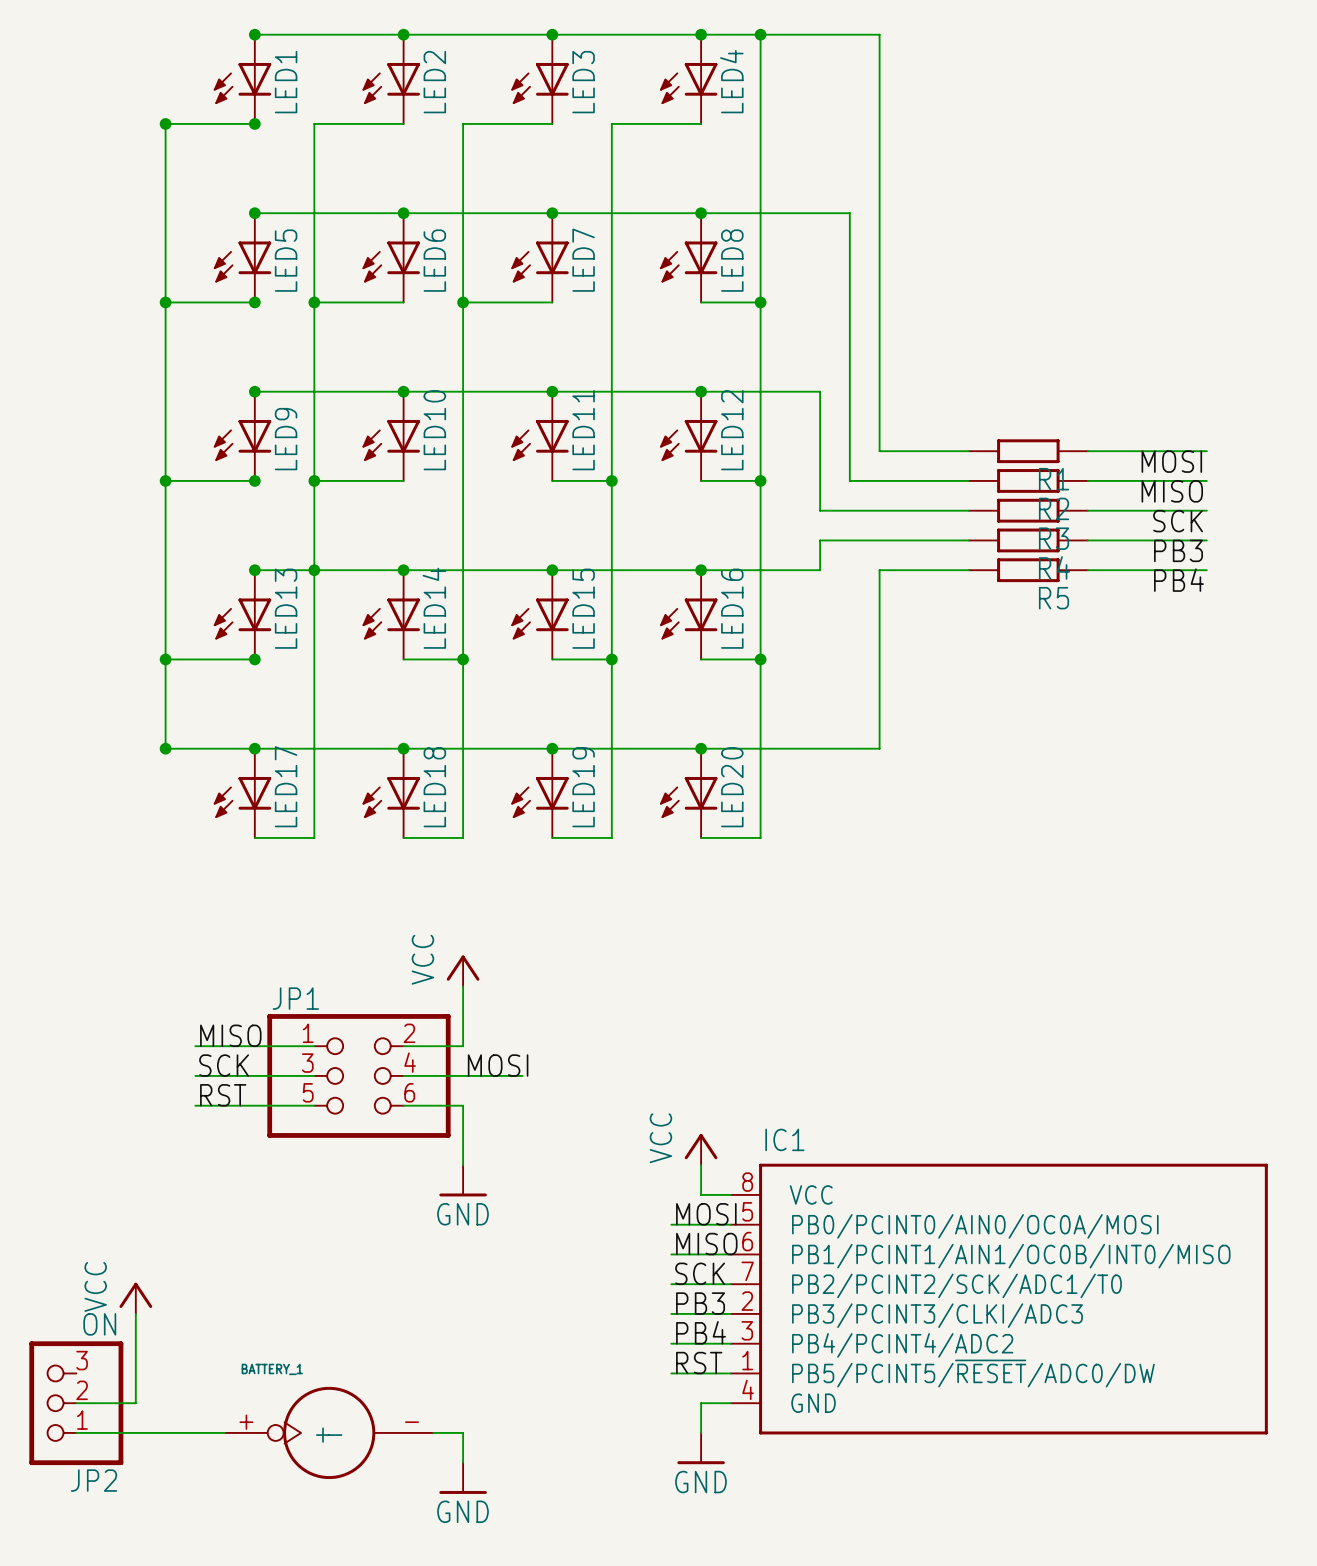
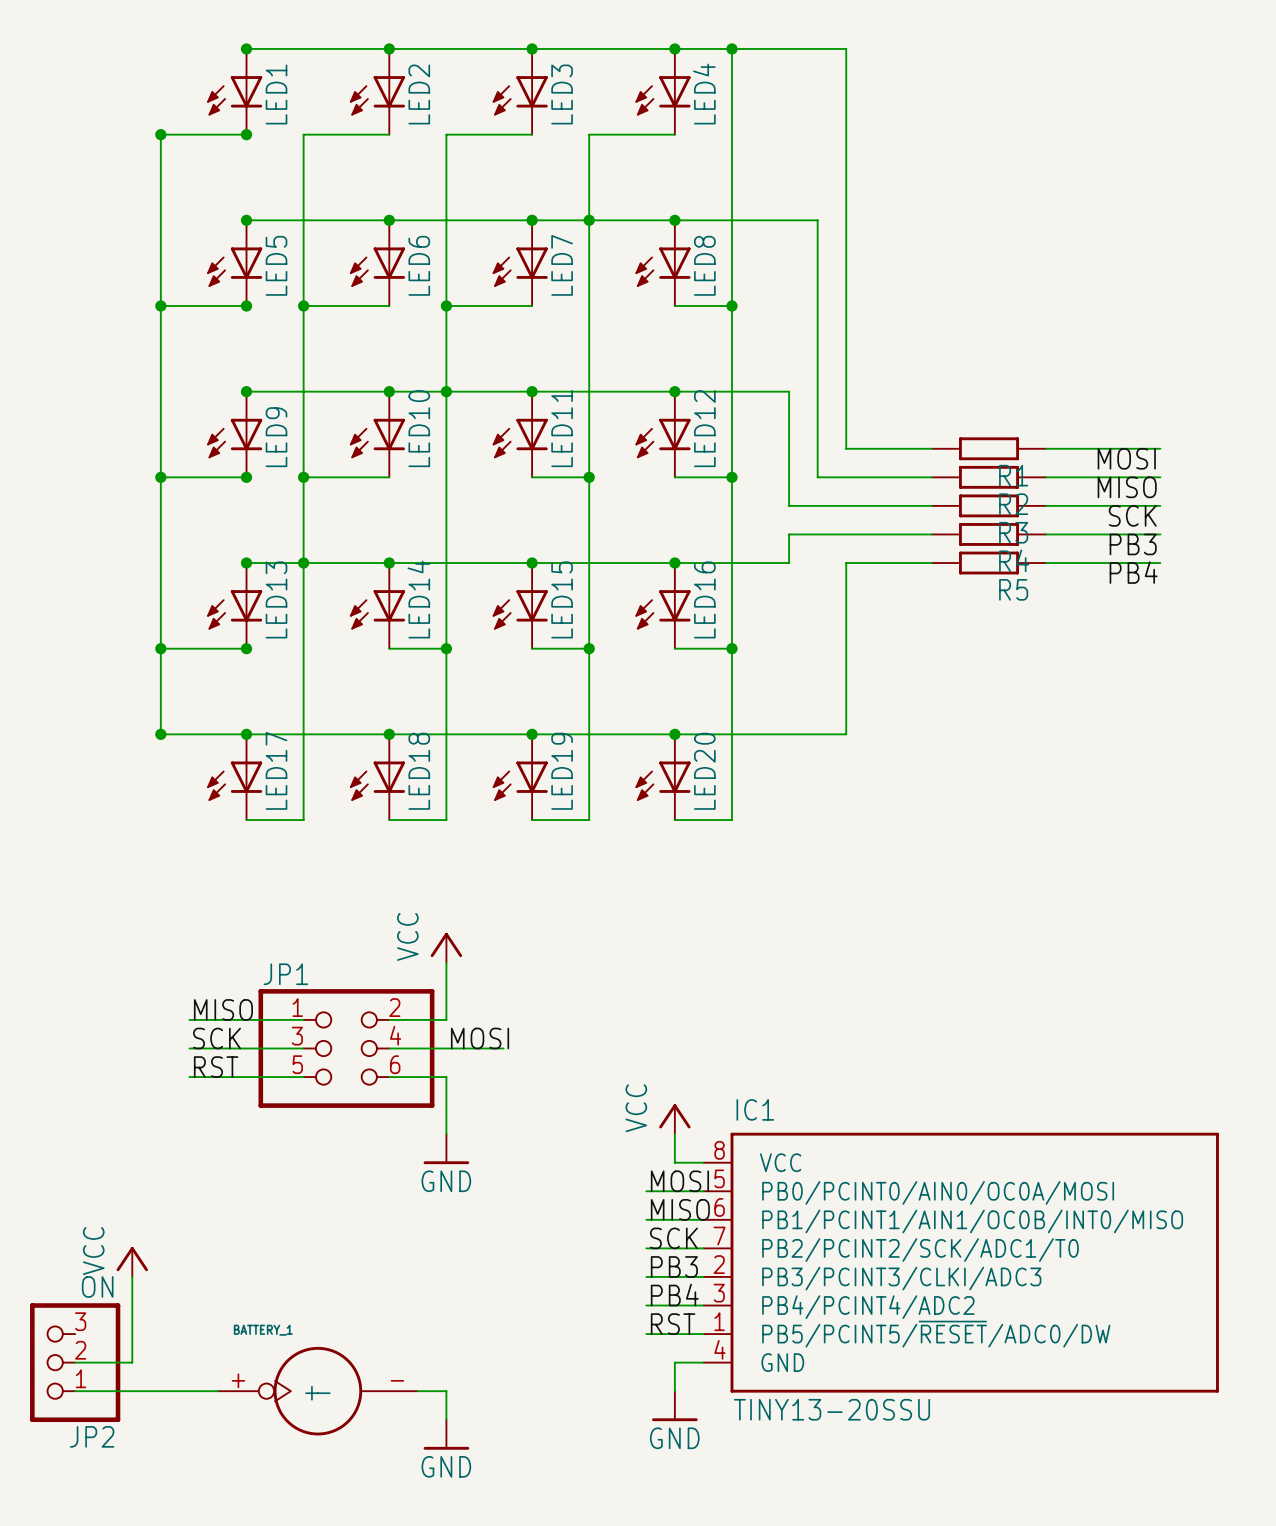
junction: none -> (589, 220)
junction: none -> (446, 391)
IC1 value: none -> TINY13-20SSU (831, 1409)

